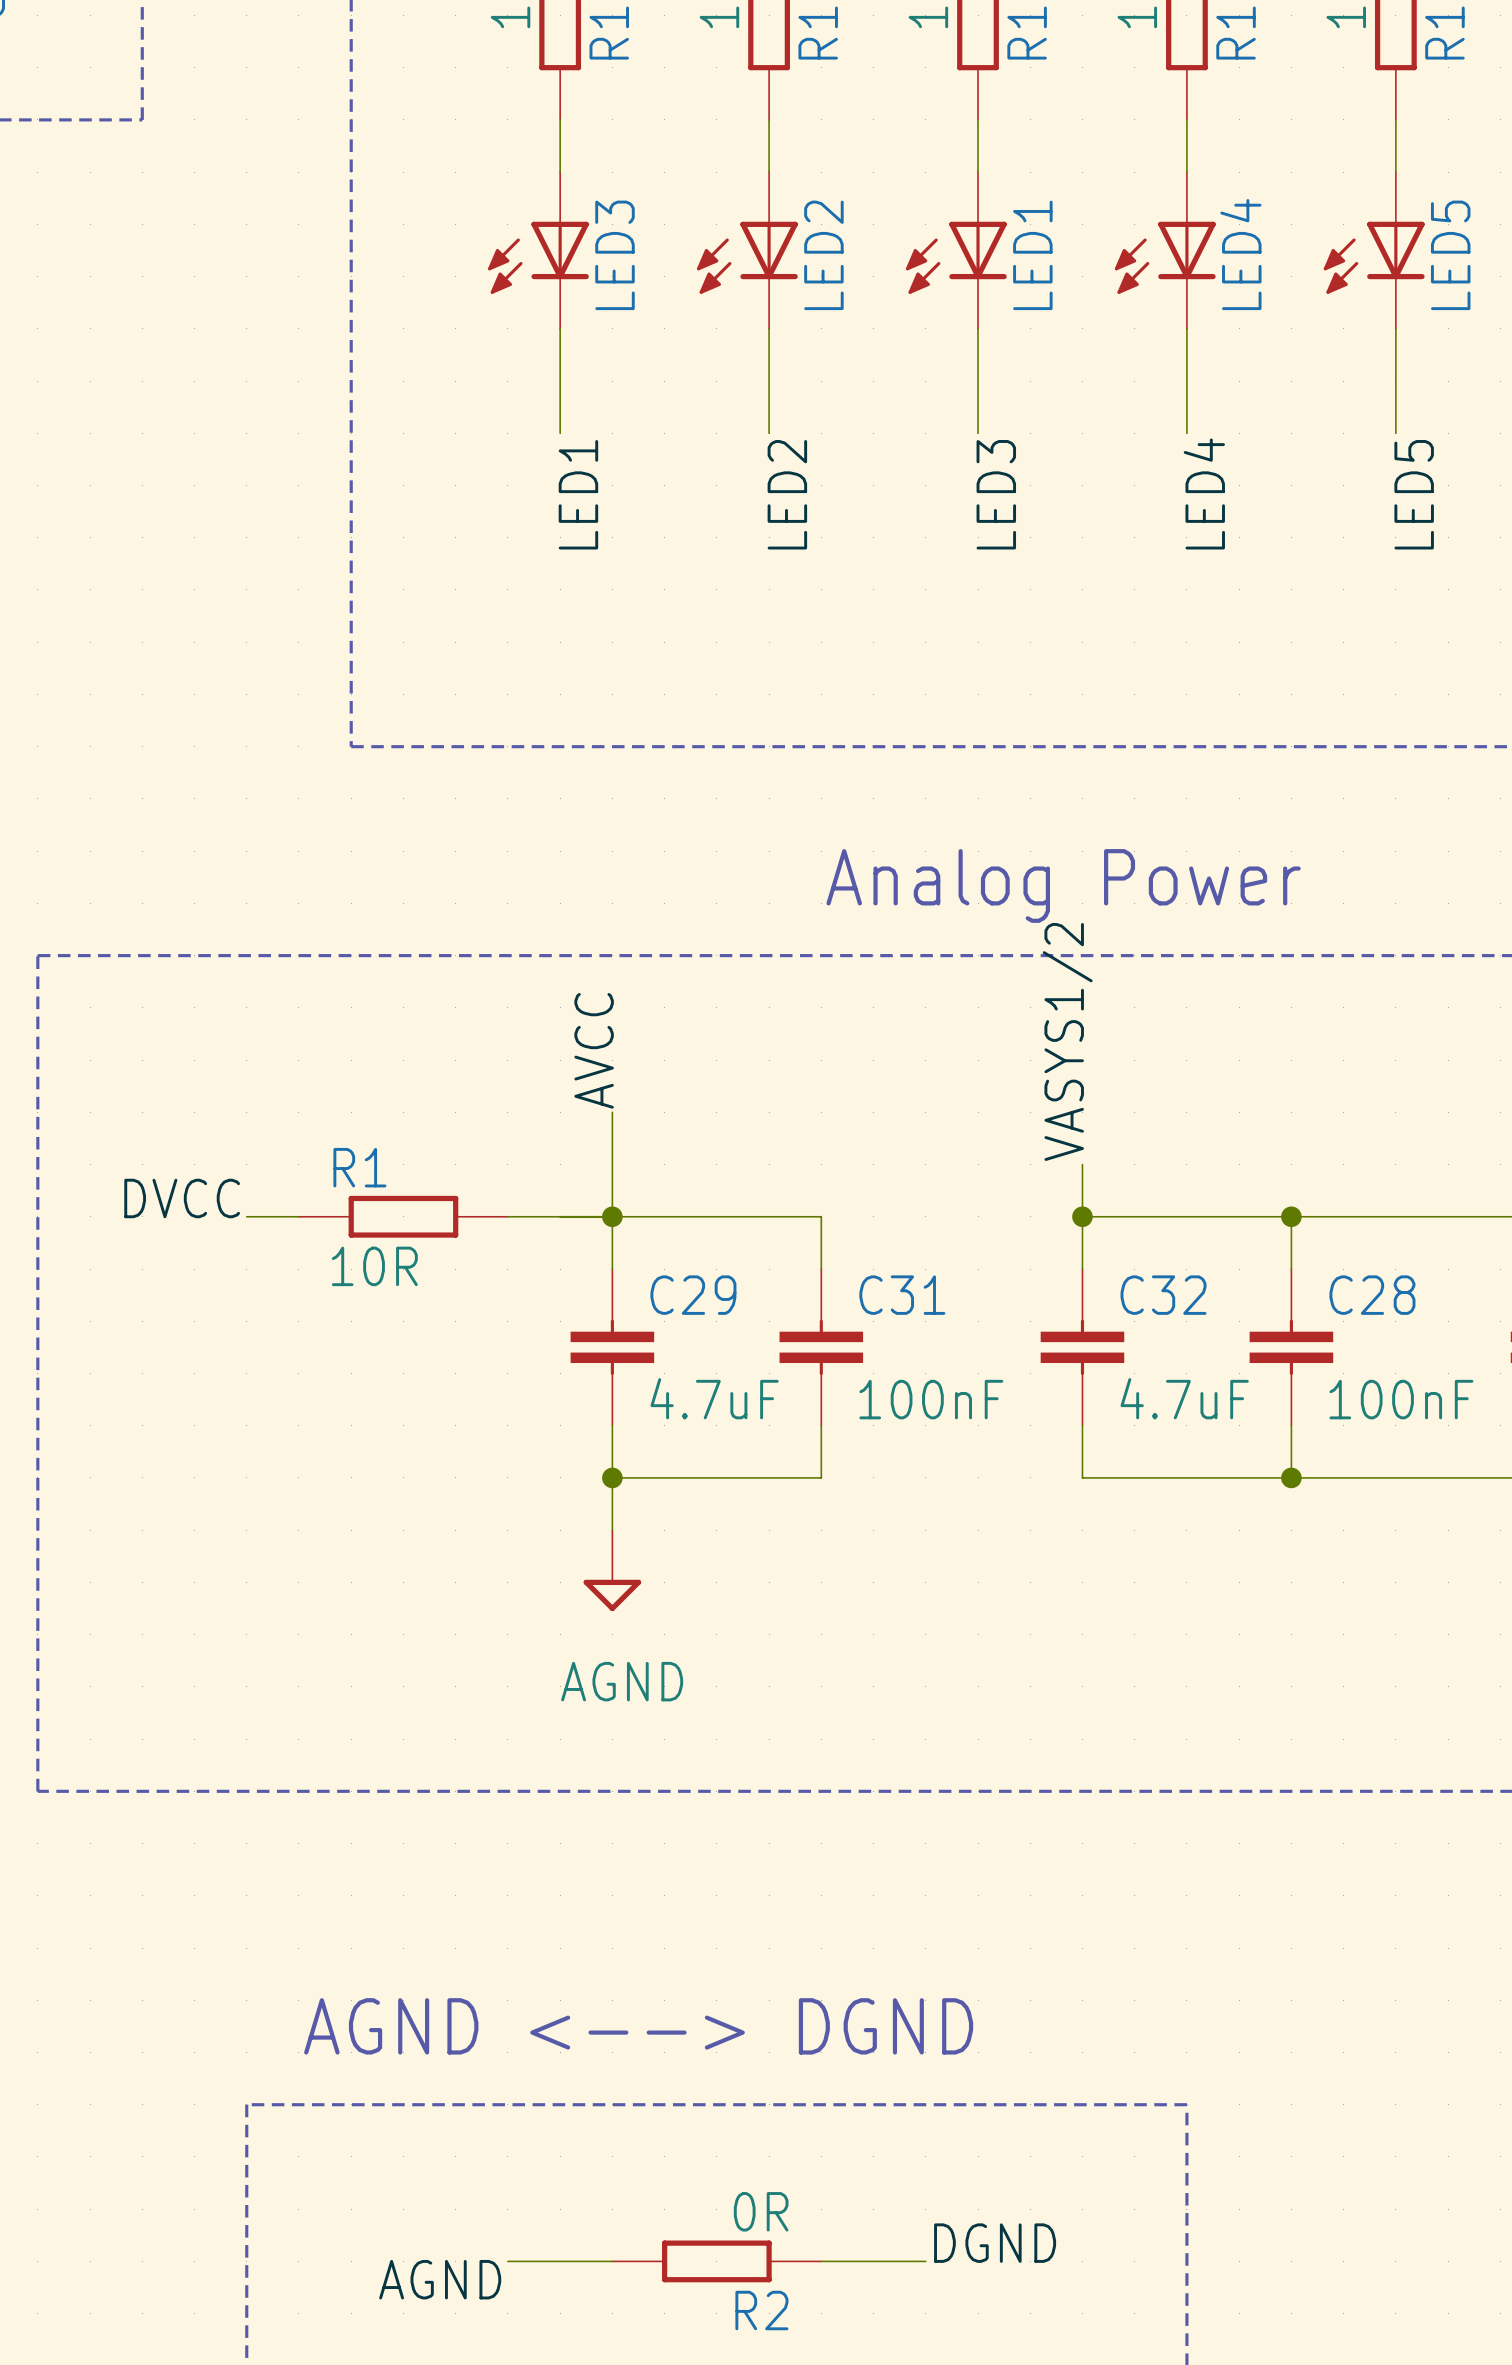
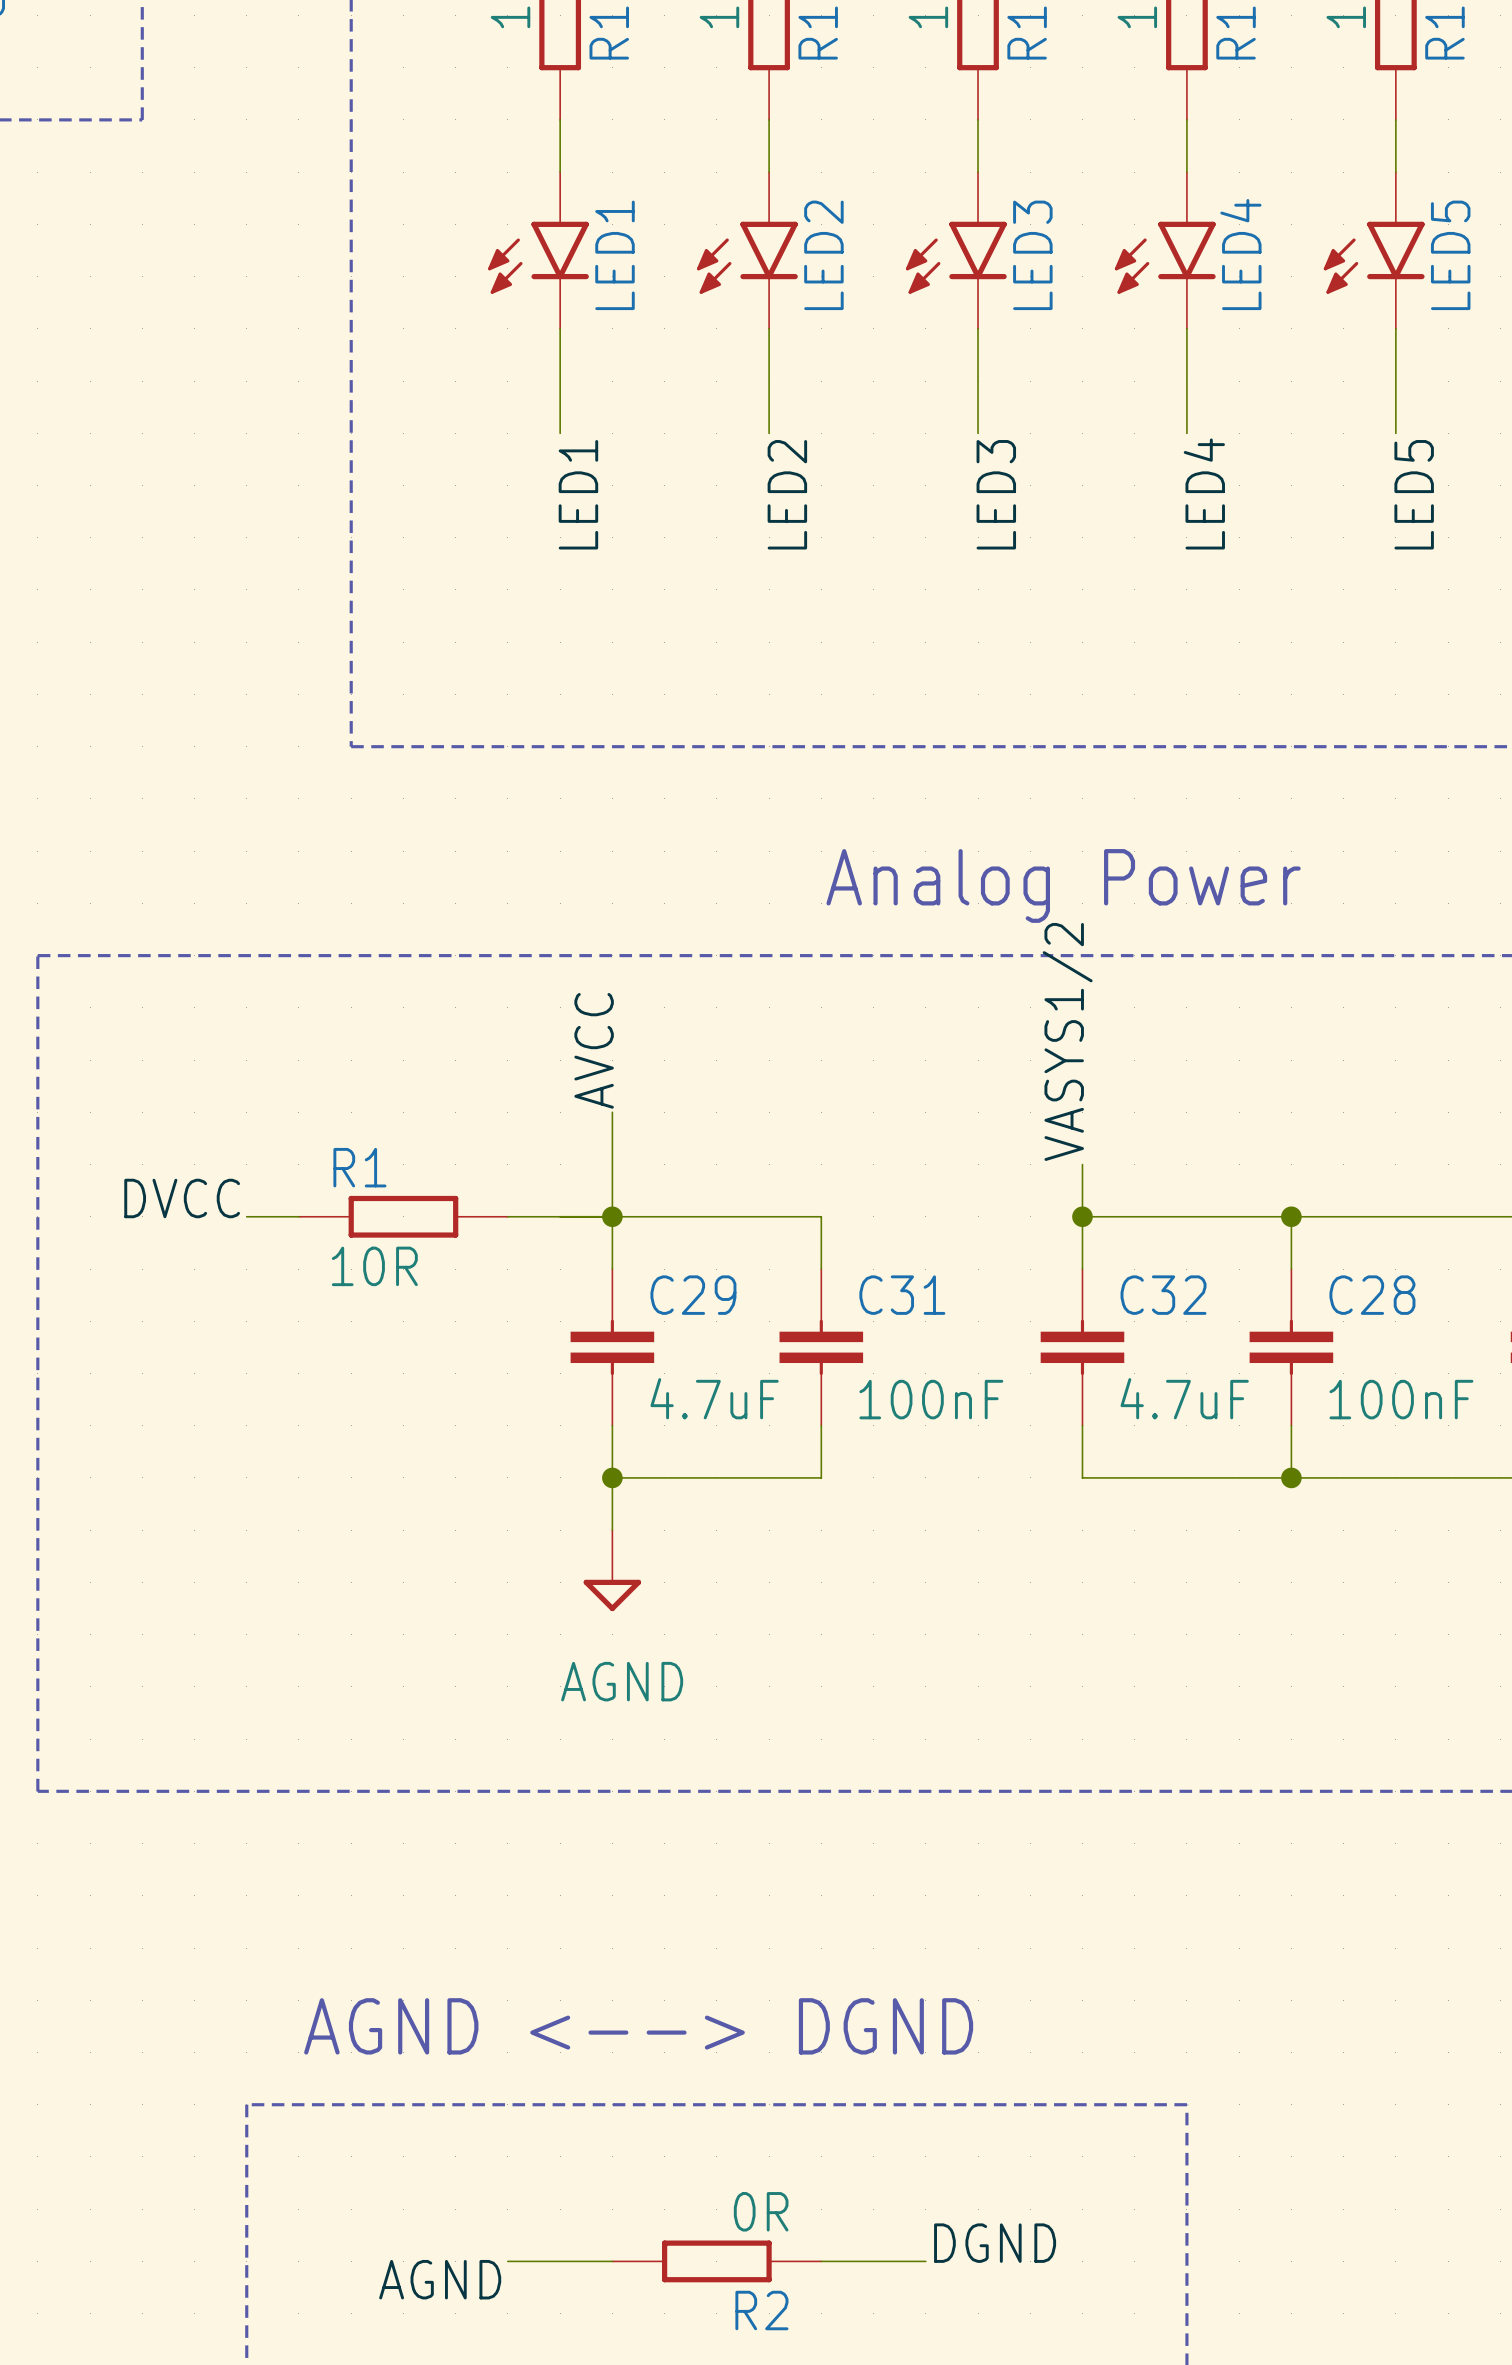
LED3 symbol: [488, 172, 589, 329] -> [905, 172, 1007, 329]
LED2 symbol: [697, 172, 798, 329] -> [697, 172, 798, 329]
LED1 symbol: [905, 172, 1007, 329] -> [488, 172, 589, 329]
LED4 symbol: [1114, 172, 1216, 329] -> [1114, 172, 1216, 329]
LED5 symbol: [1323, 172, 1425, 329] -> [1323, 172, 1425, 329]

